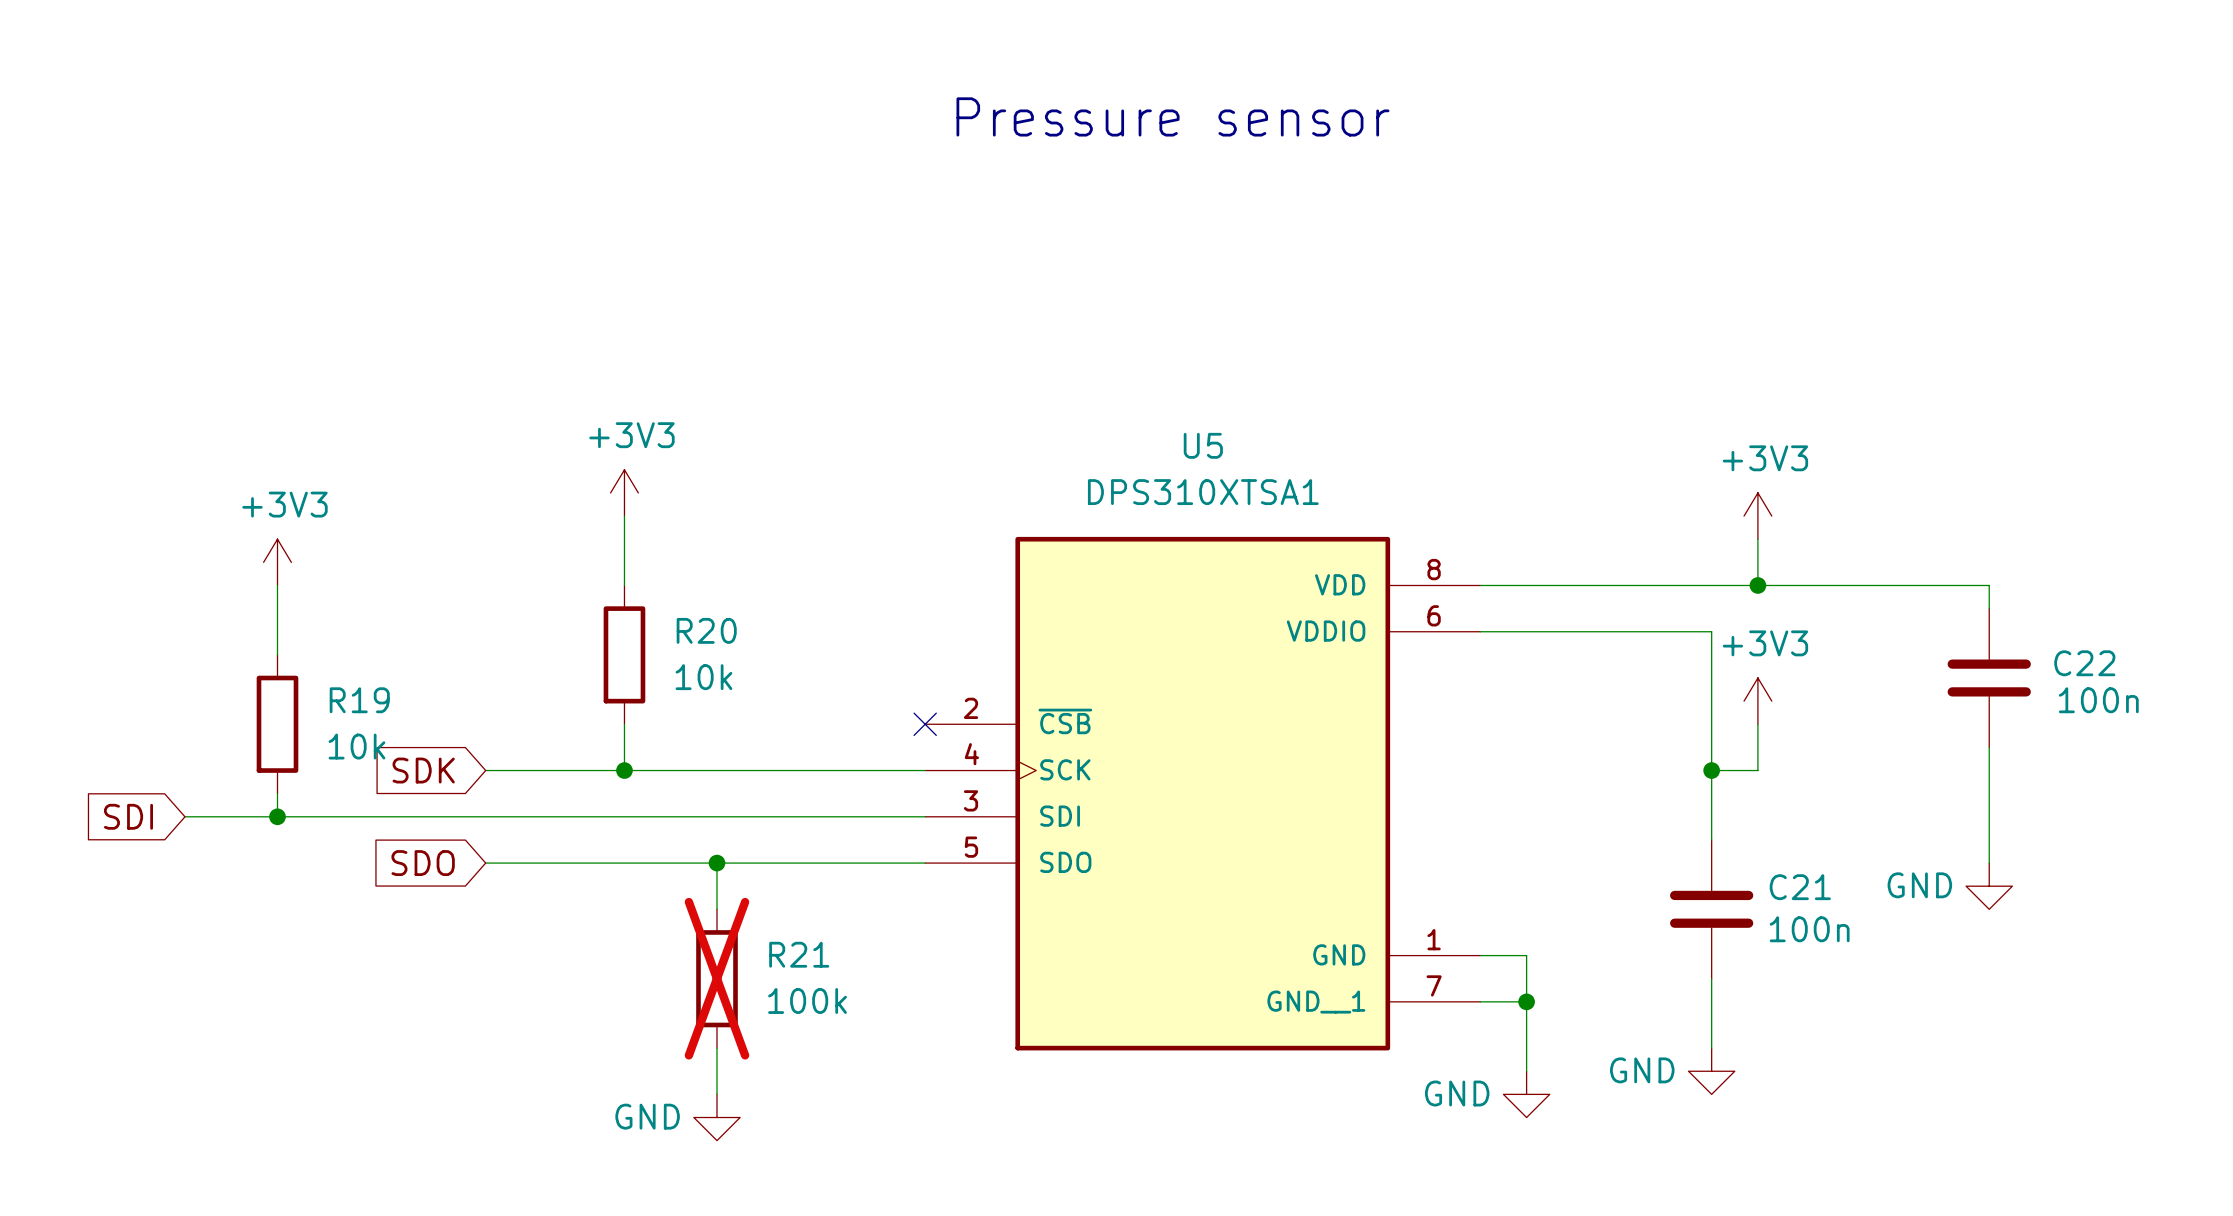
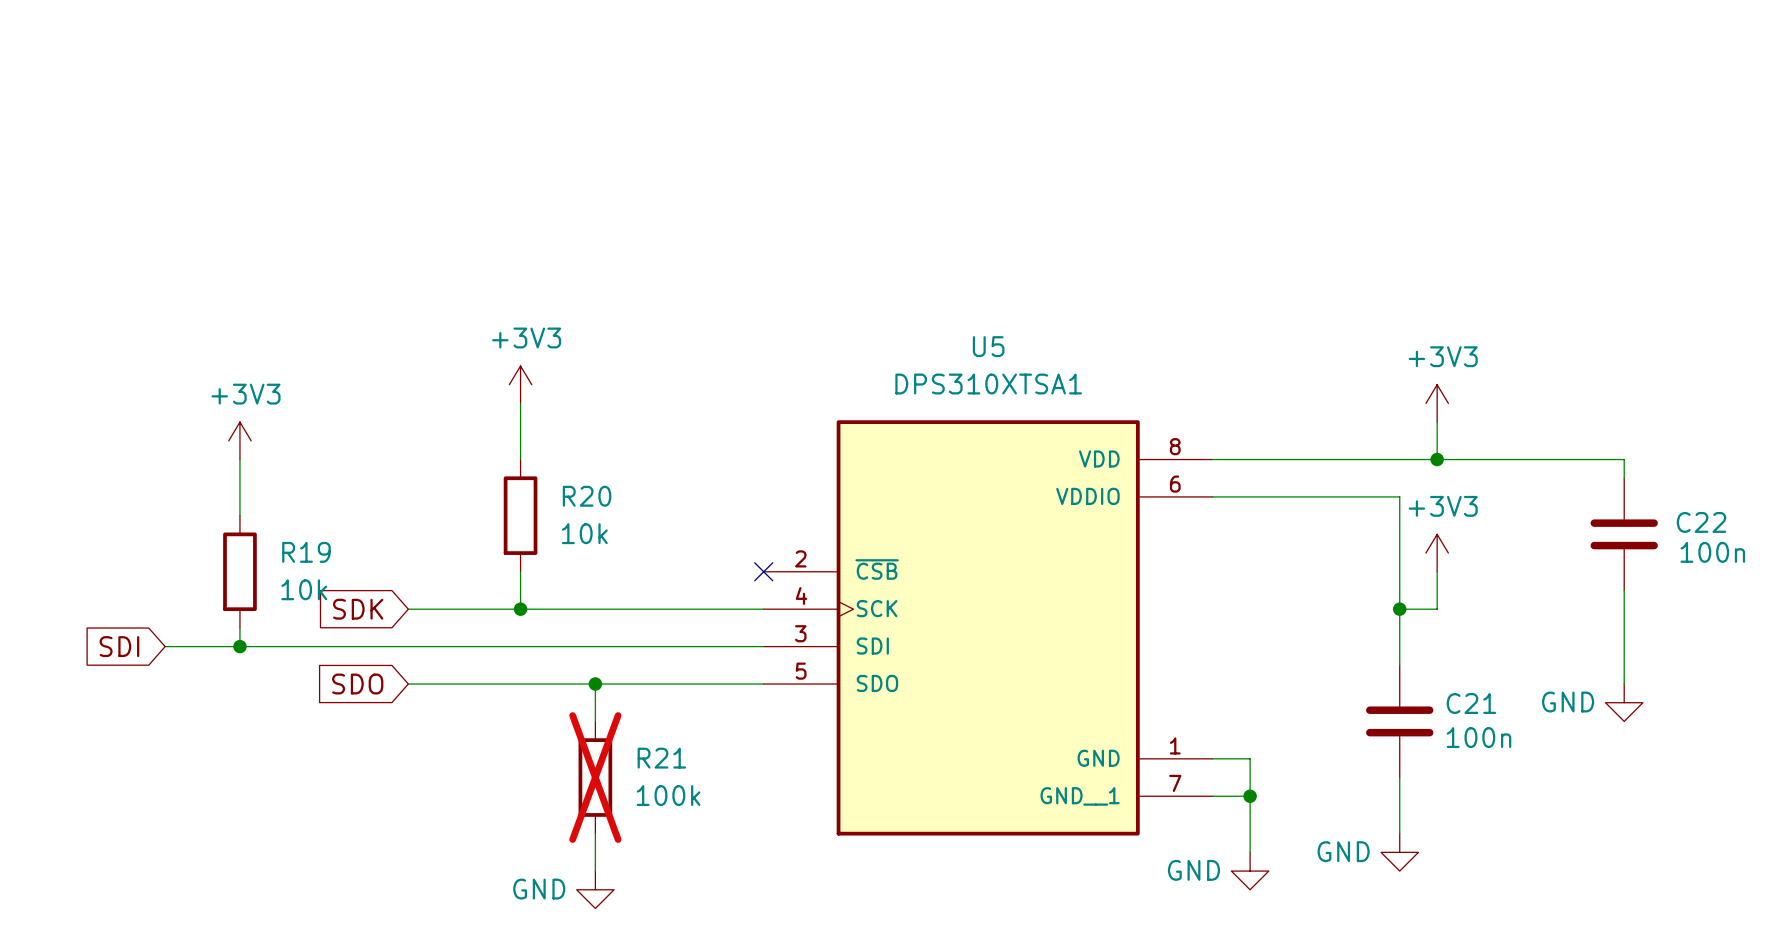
text: Pressure sensor (1172, 116) -> none

